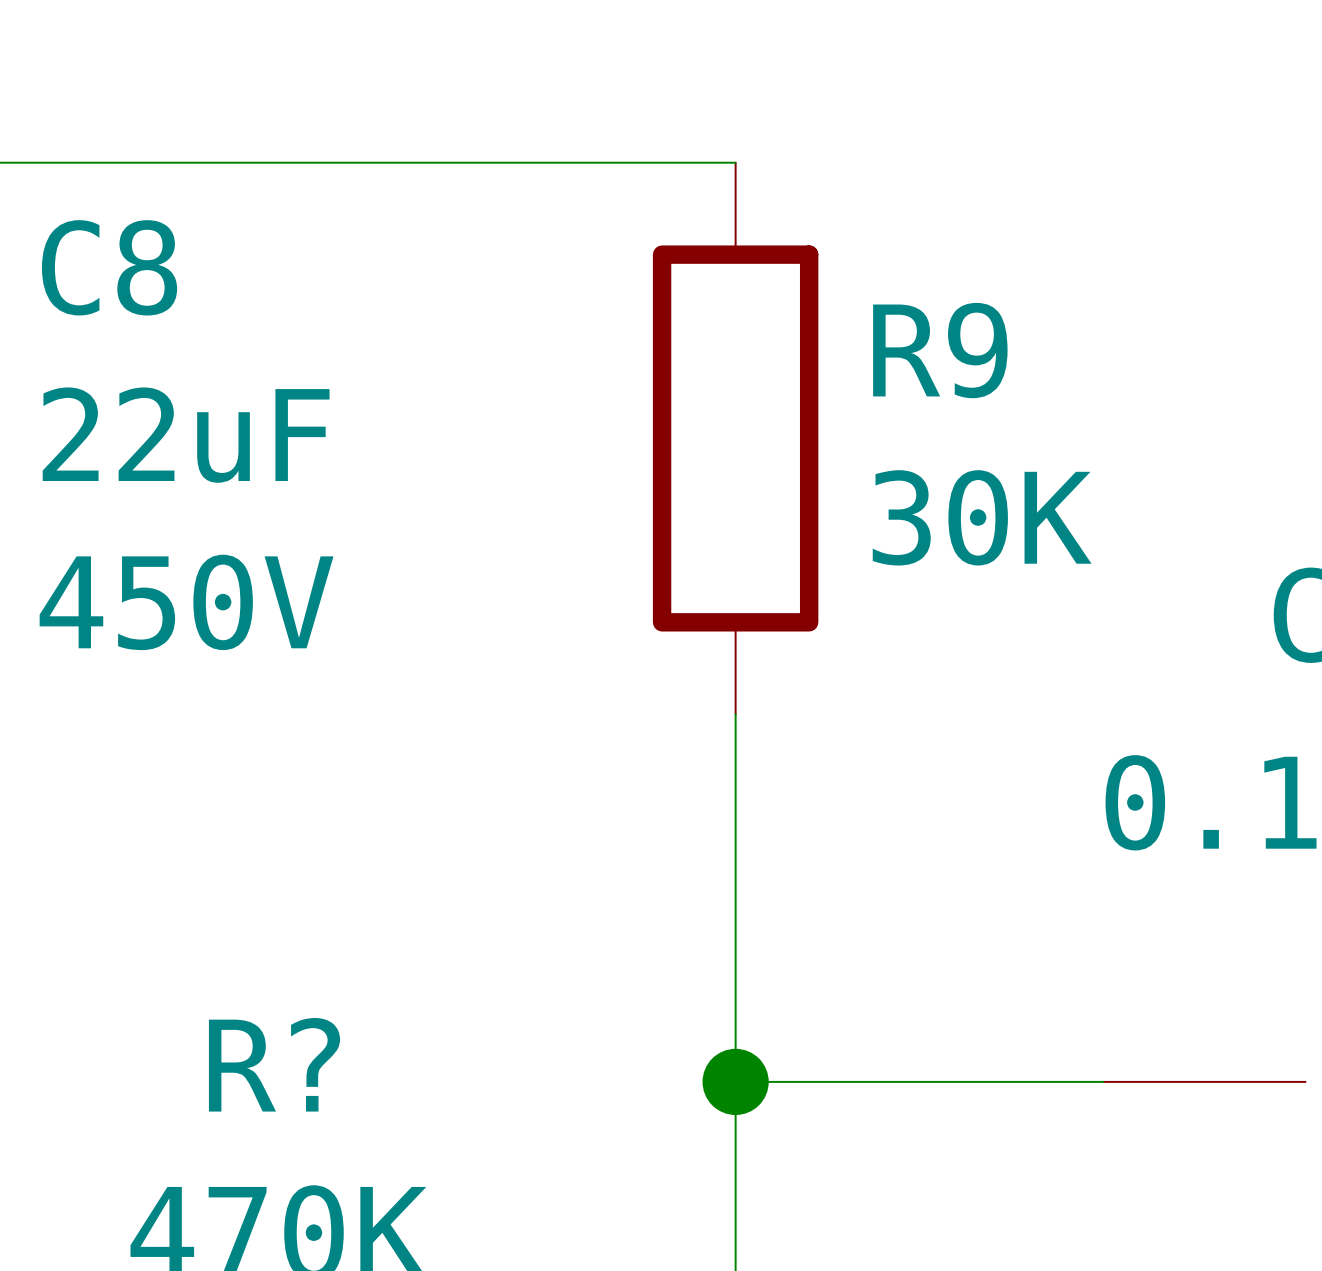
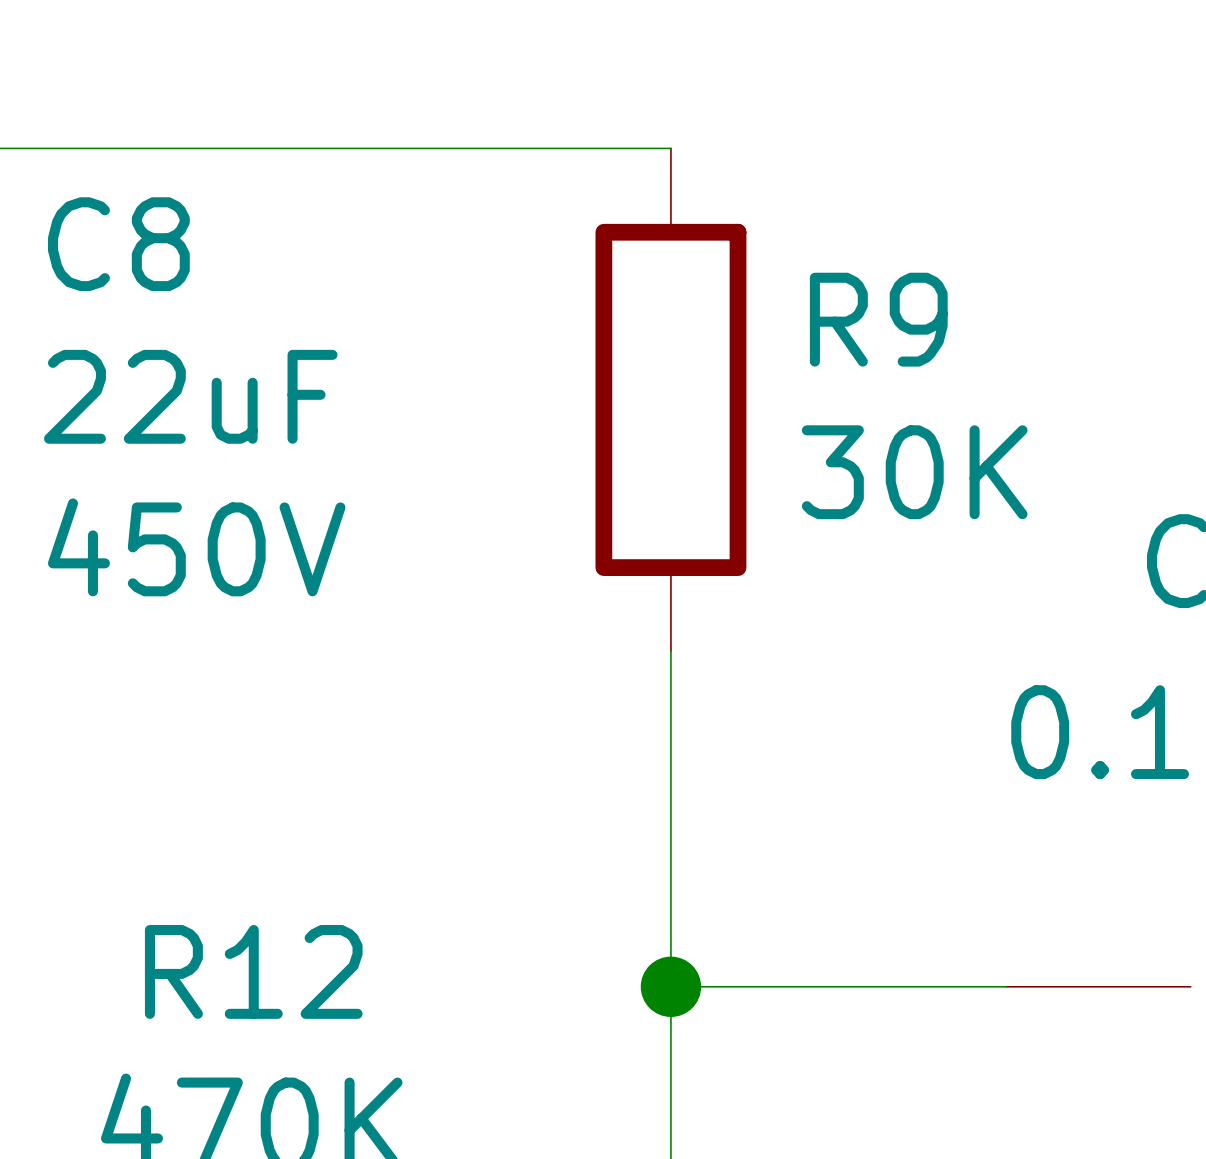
R? name: R? (274, 1064) -> R12 (253, 971)

